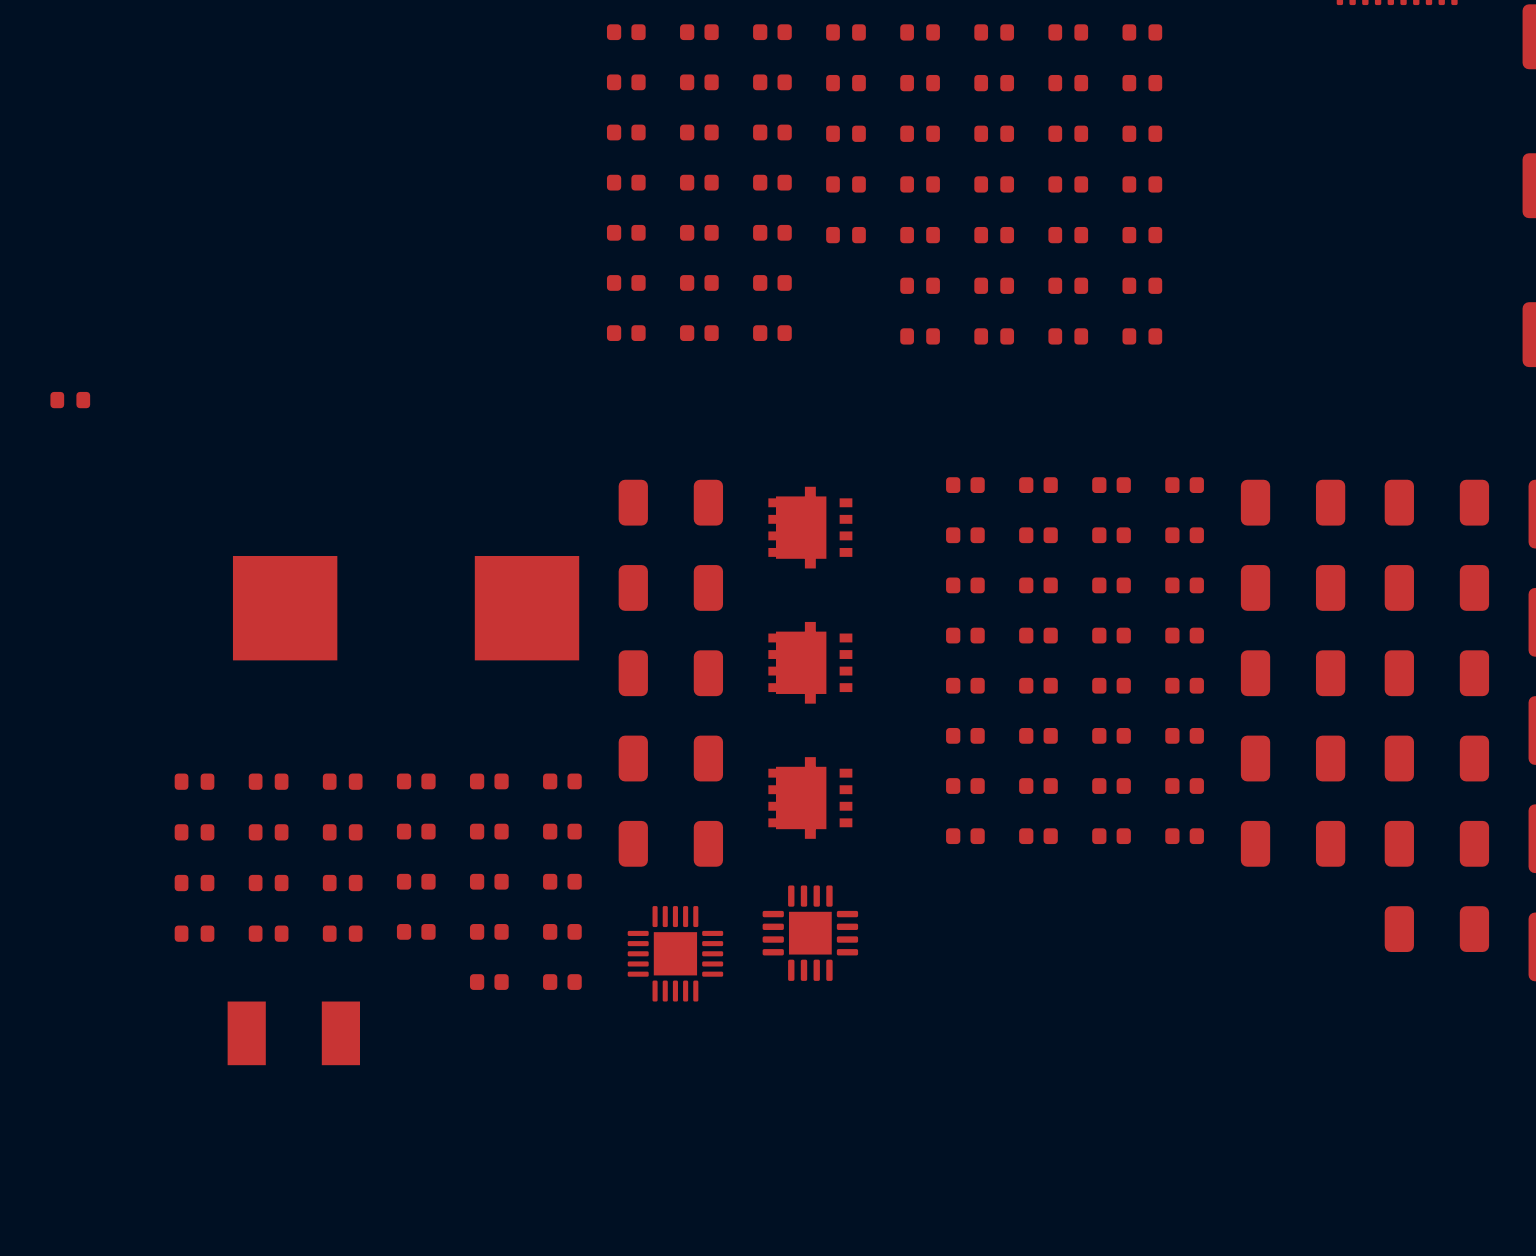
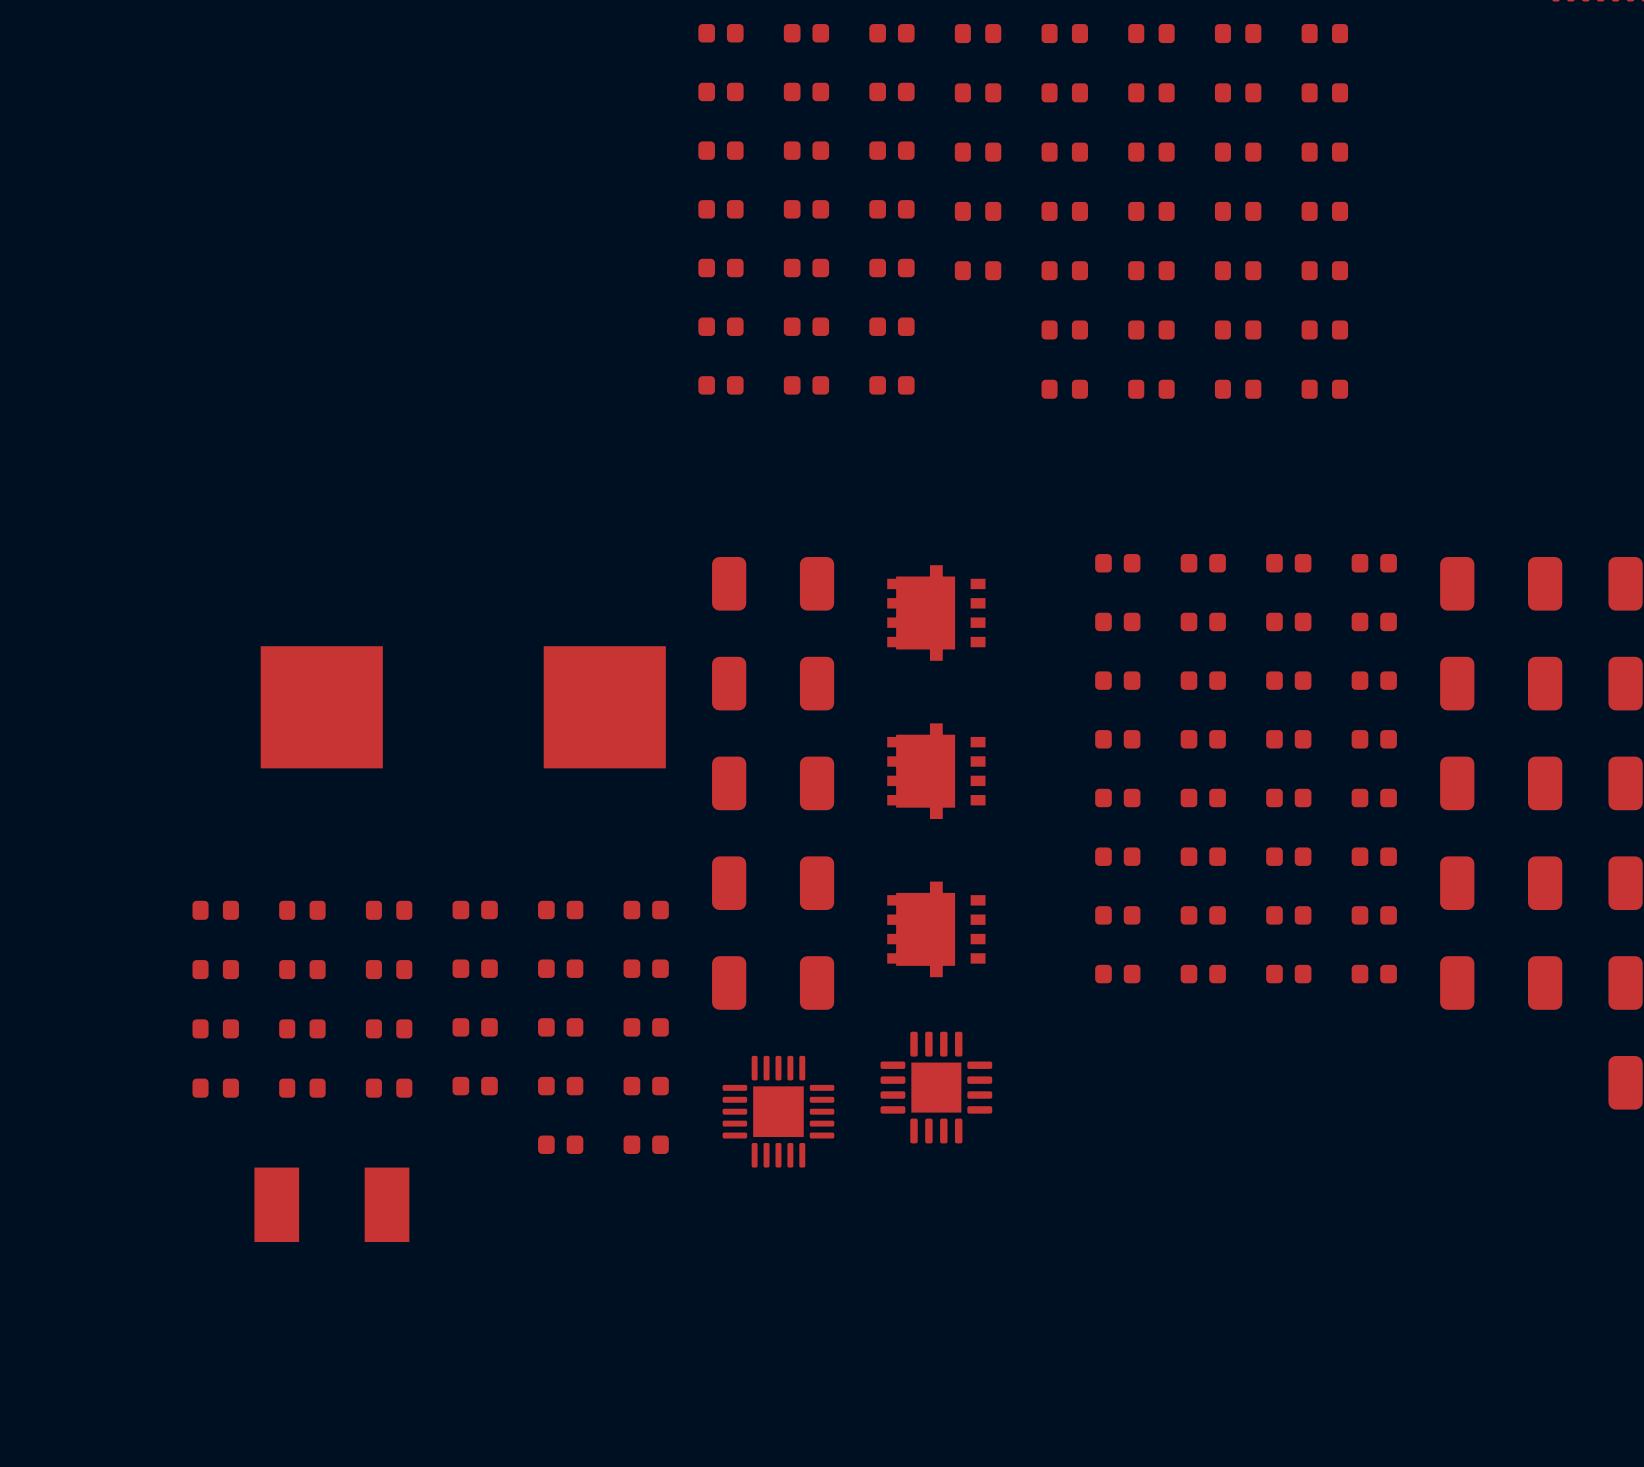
part: (70, 400) -> none

